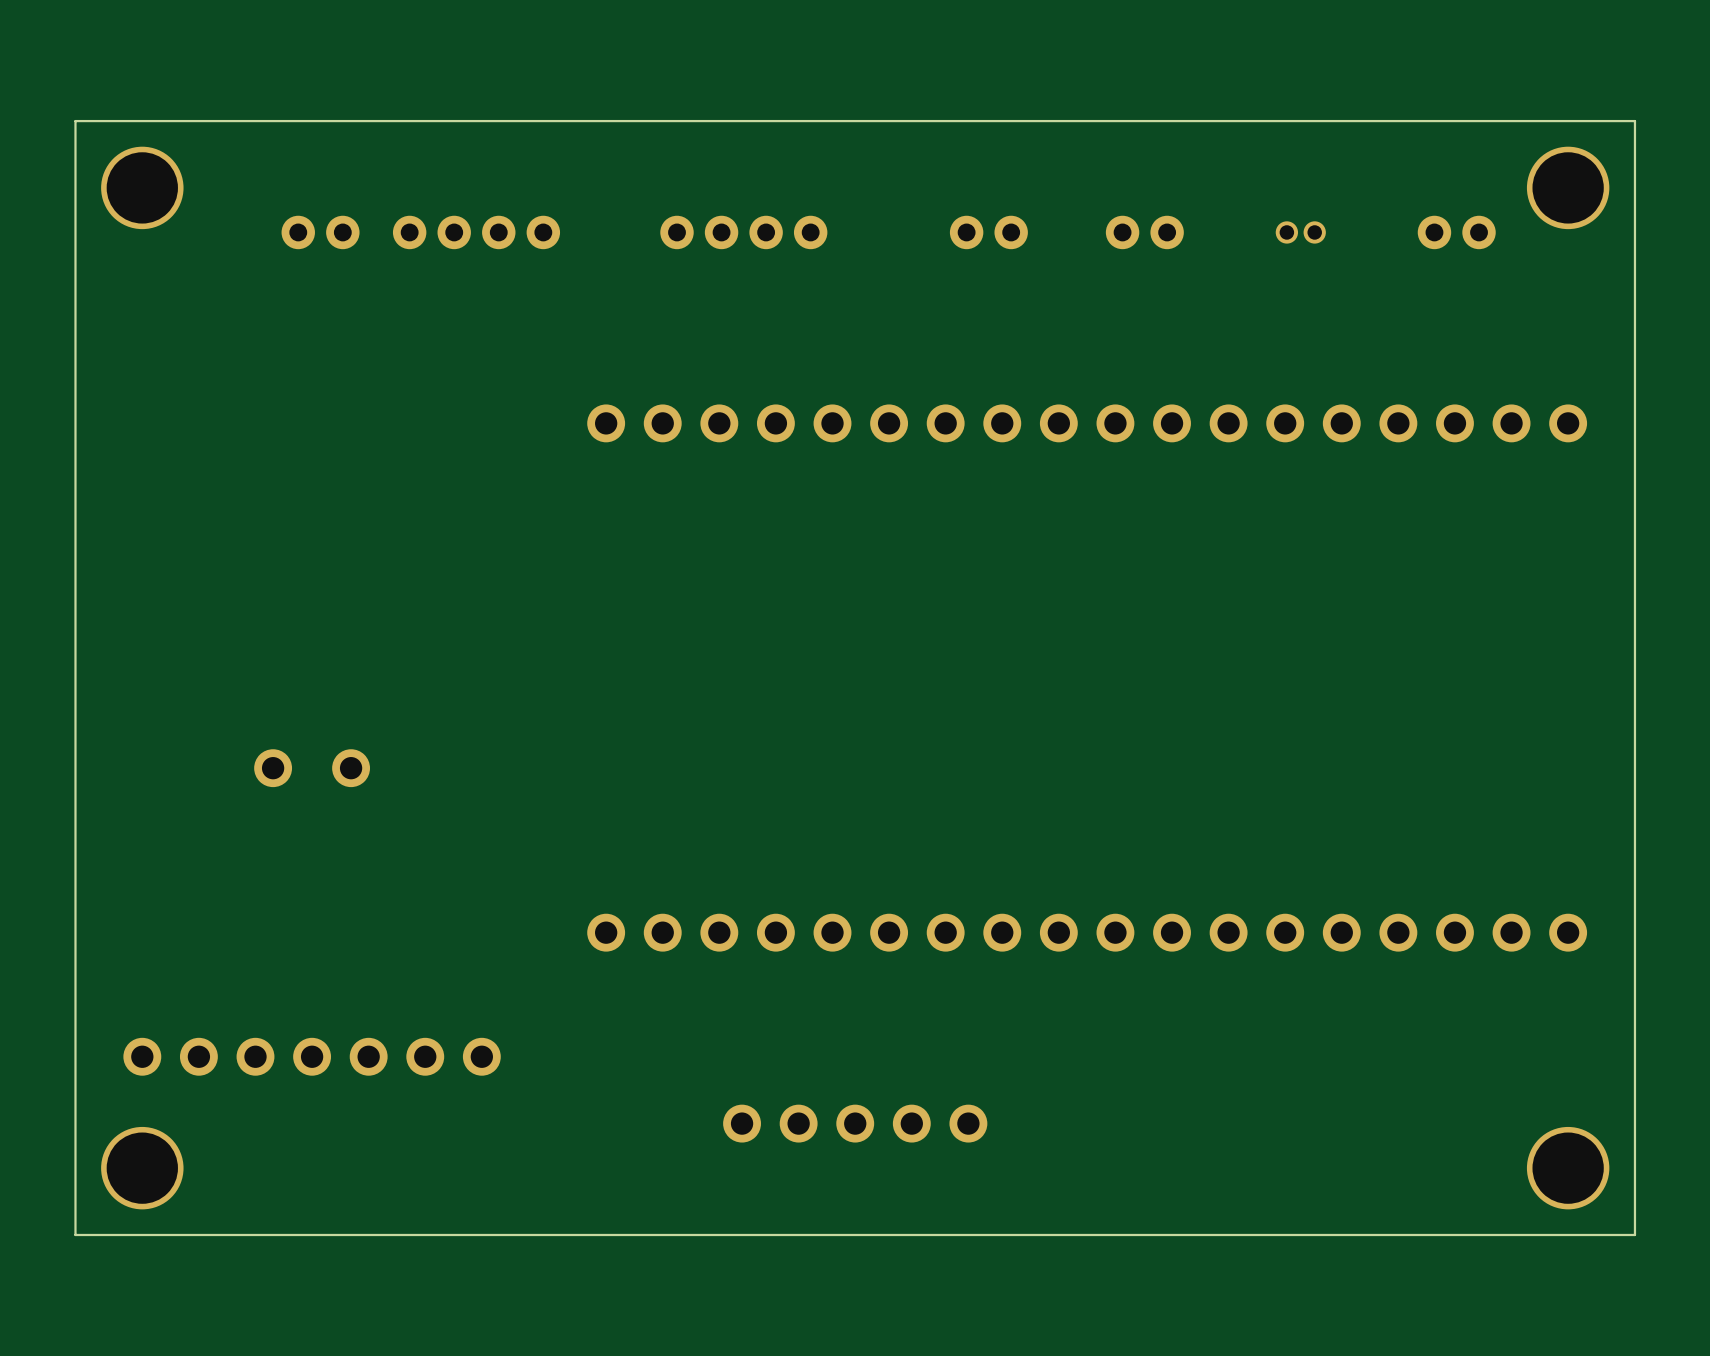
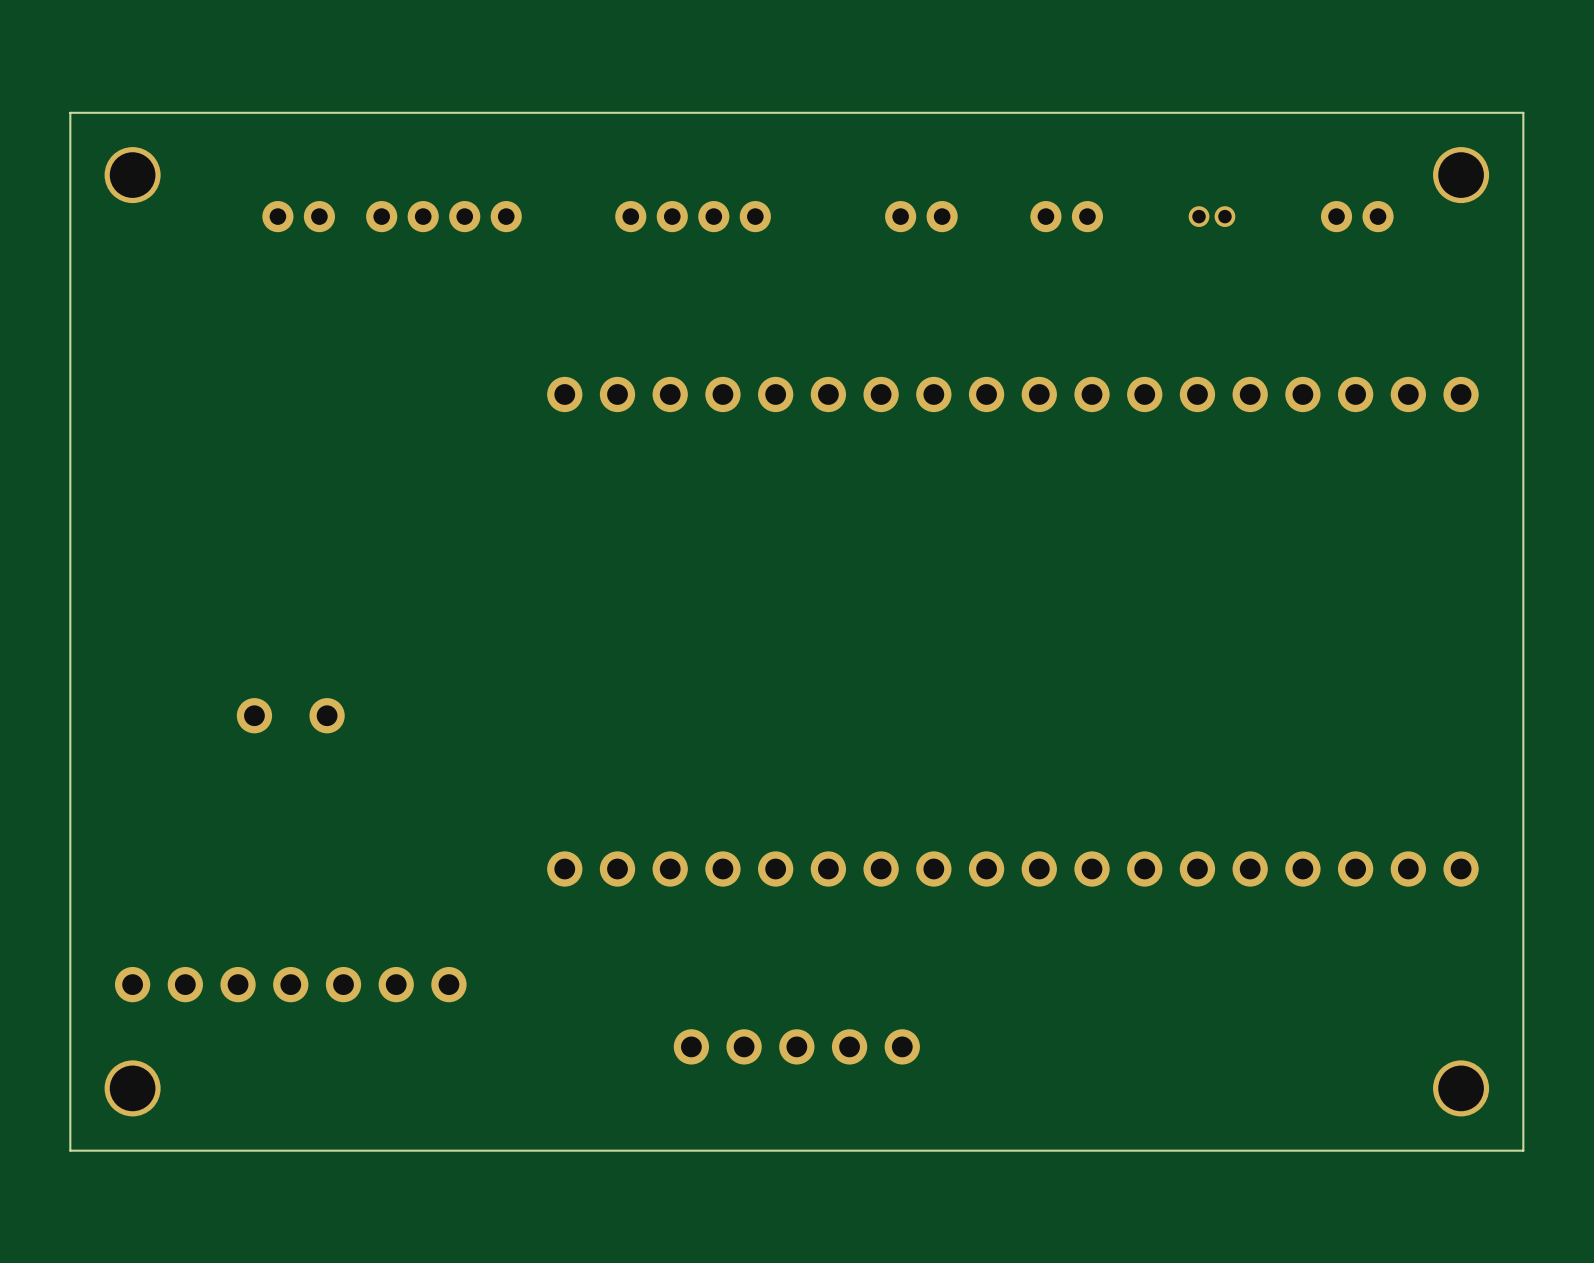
part footprint: [101, 146, 184, 230] -> [104, 147, 161, 204]
part footprint: [1526, 146, 1610, 230] -> [1433, 147, 1490, 204]
part footprint: [101, 1126, 184, 1210] -> [104, 1060, 161, 1117]
part footprint: [1526, 1126, 1610, 1210] -> [1433, 1060, 1490, 1117]

